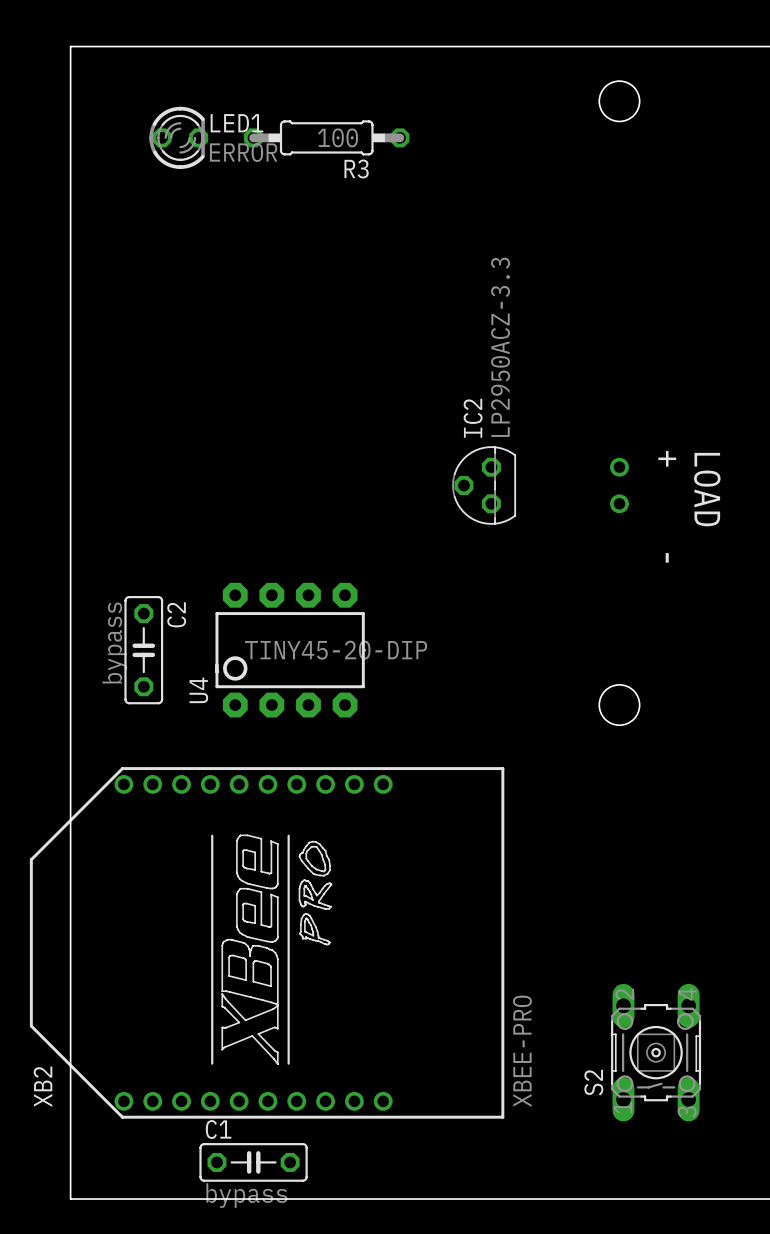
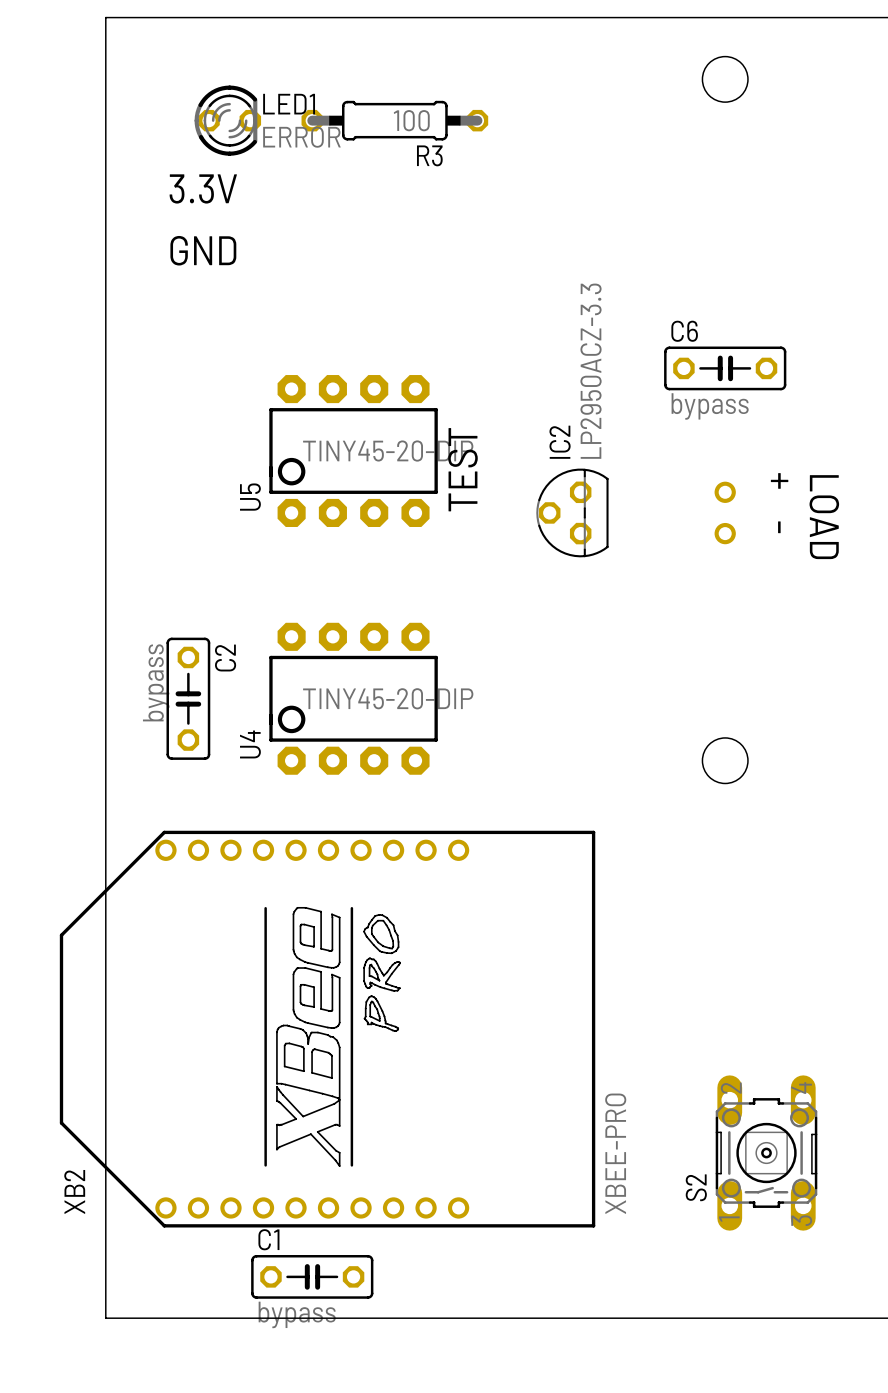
text: none -> 3.3V (203, 188)
text: none -> GND (203, 250)
C6: none -> bypass (725, 368)
U5: none -> TINY45-20-DIP (353, 451)
text: none -> TEST (462, 469)

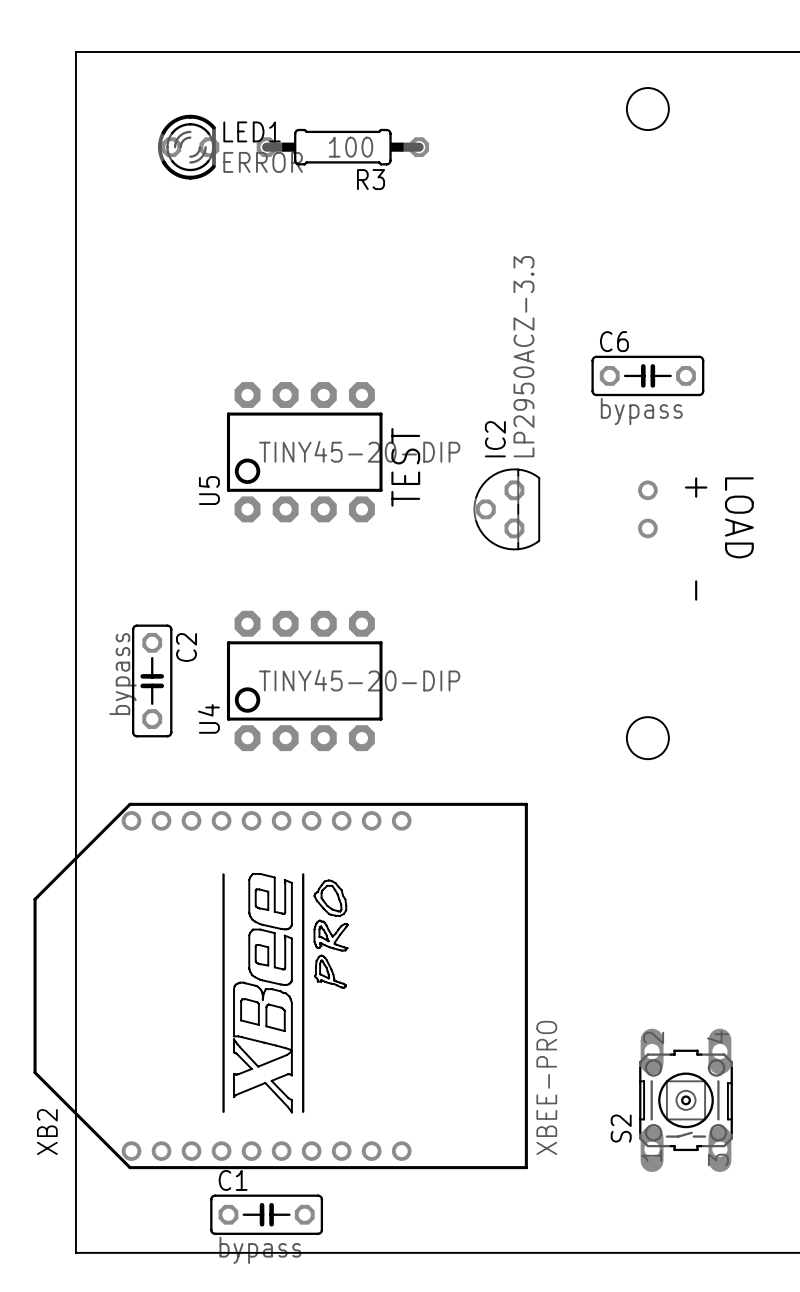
text: 3.3V (203, 188) -> none
text: GND (203, 250) -> none

